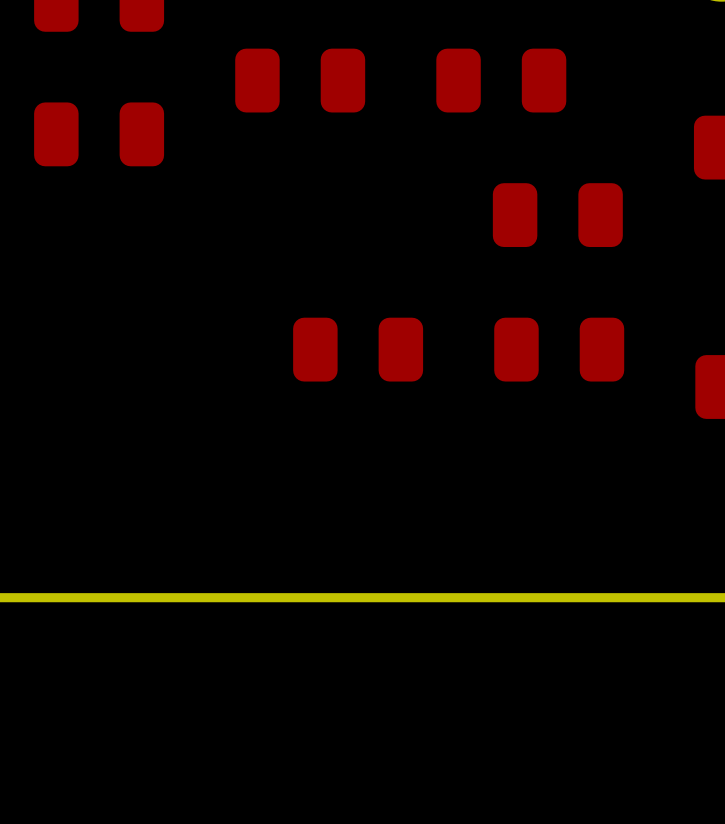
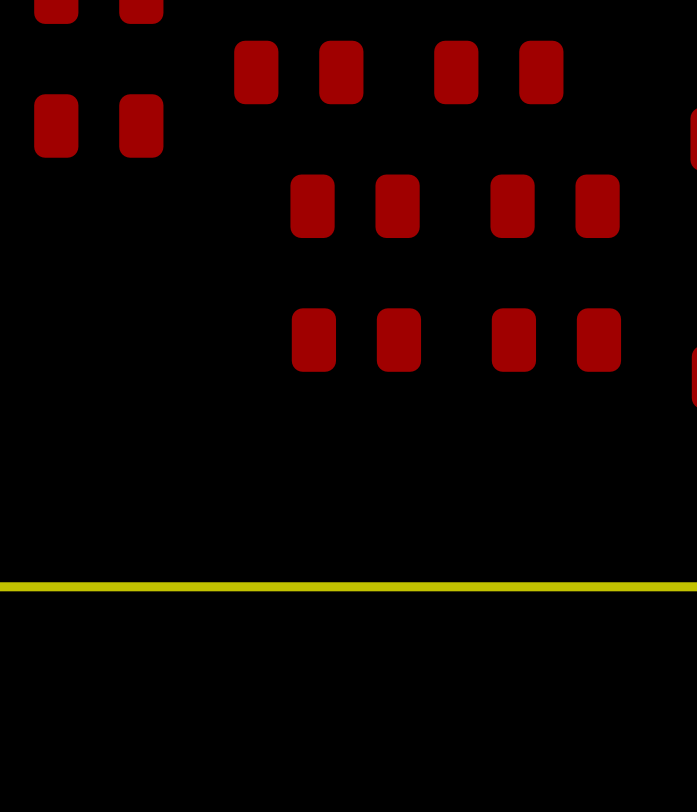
part: none -> (355, 206)

